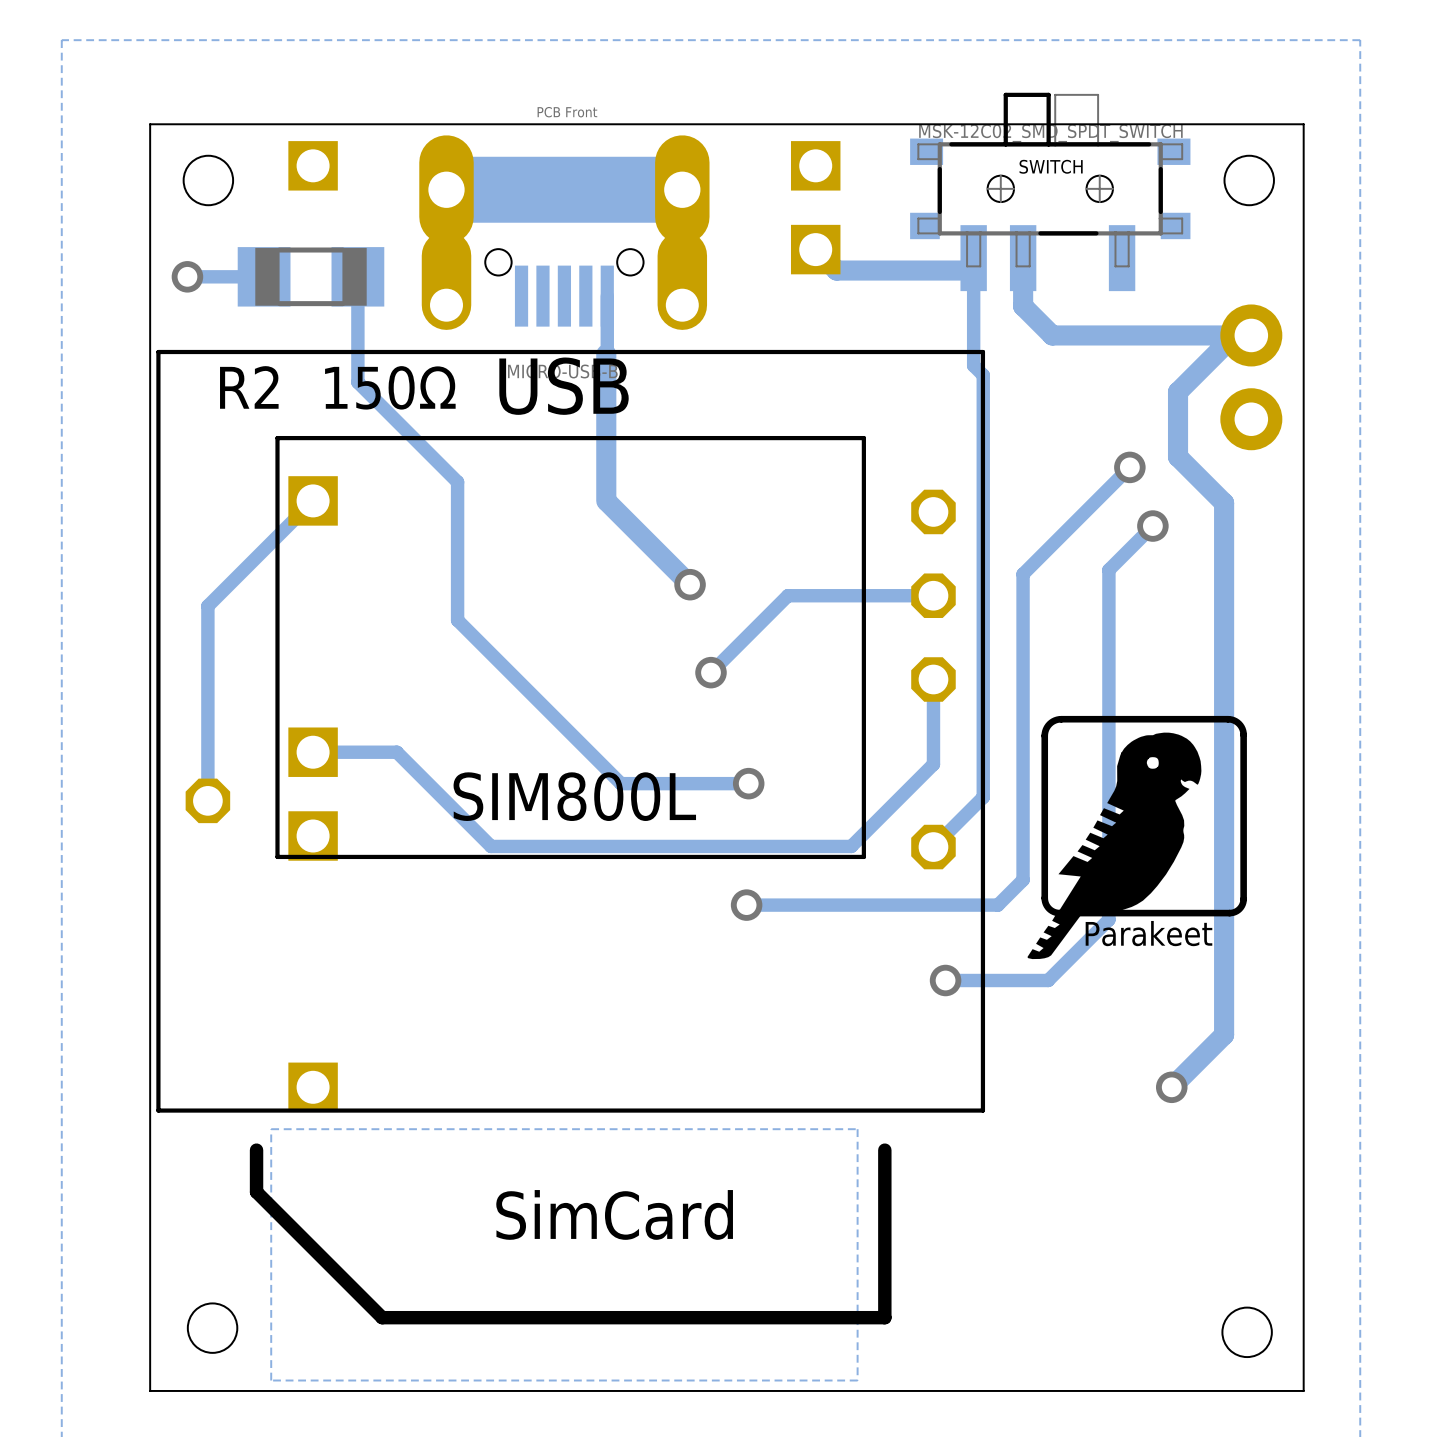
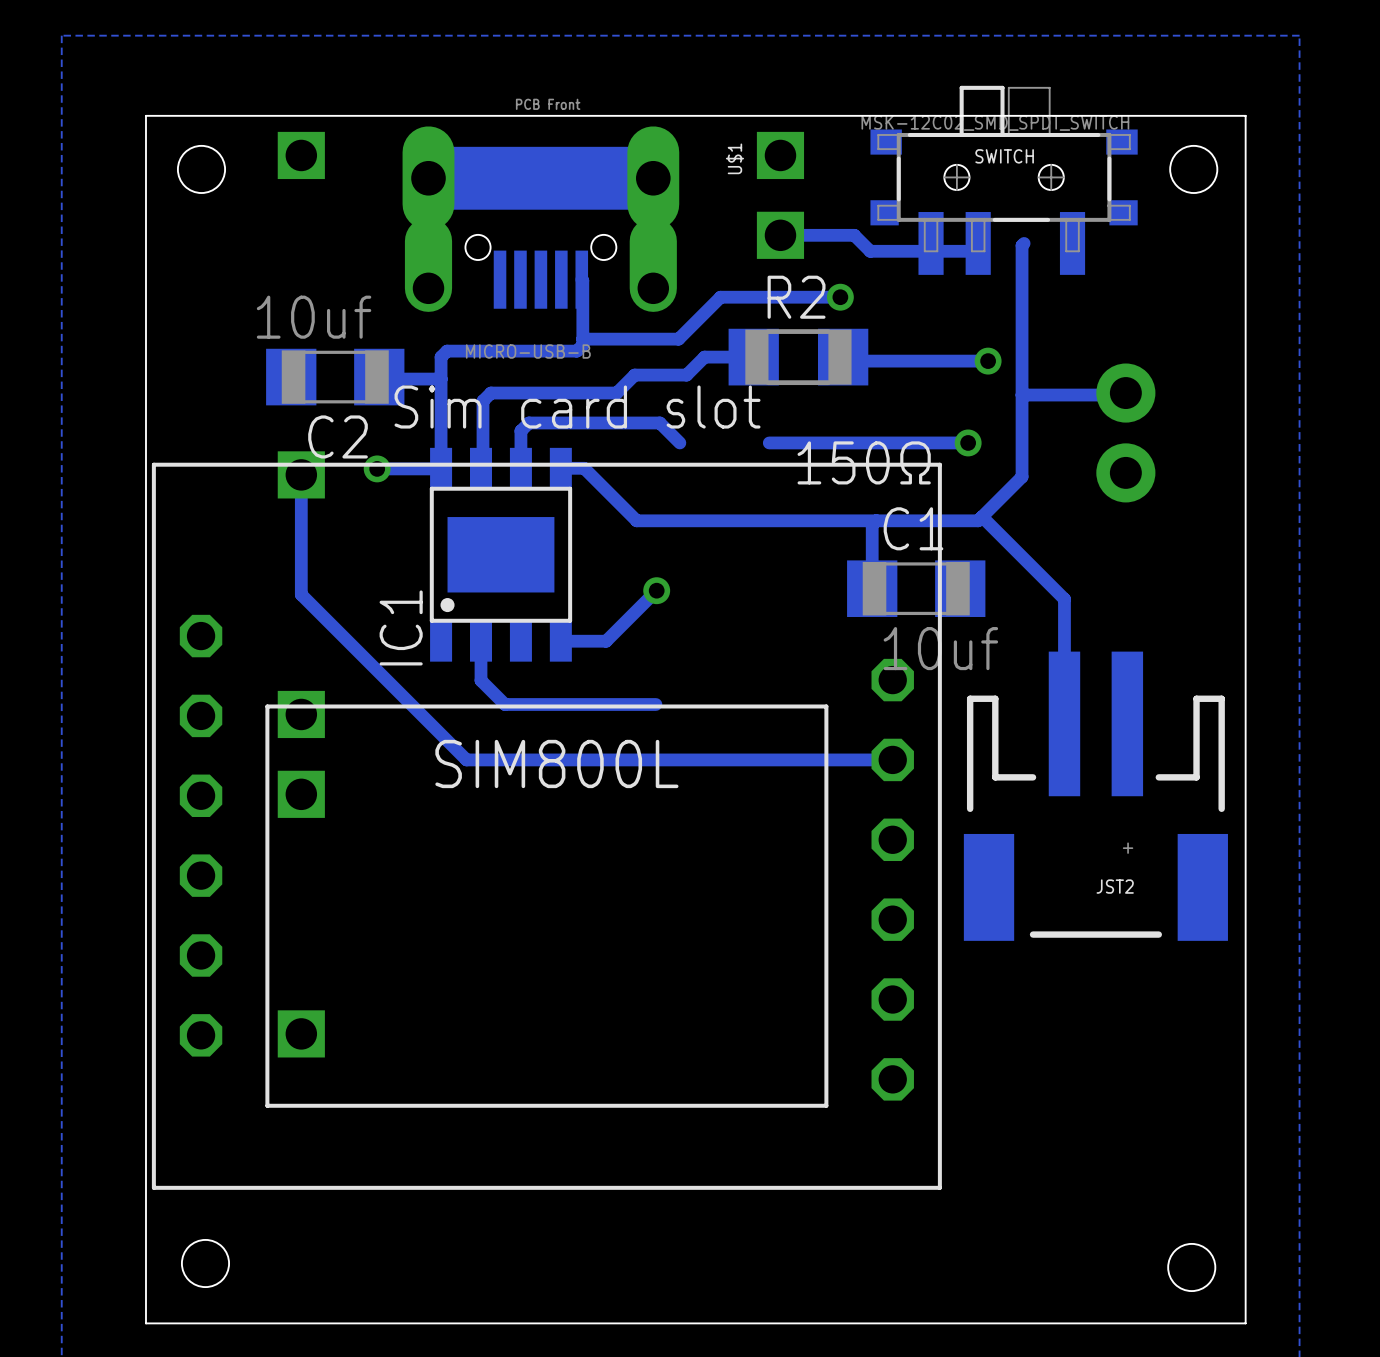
track: (815, 249) (836, 270) (962, 270) (971, 265) (973, 258) (973, 365) (983, 375) (983, 797) (933, 847) -> (780, 235) (854, 235) (870, 251) (969, 251) (976, 243)
track: (1023, 258) (1023, 306) (1052, 335) (1251, 335) (1234, 335) (1178, 392) (1178, 456) (1224, 503) (1224, 1034) (1171, 1087) -> none
track: none -> (1024, 243) (1022, 245) (1022, 476) (978, 520) (636, 520) (584, 468) (560, 468)
via: (187, 276) -> none
track: (264, 276) (187, 276) -> none
R2 position: (310, 276) -> (798, 357)
track: (357, 276) (357, 382) (457, 482) (457, 620) (620, 783) (748, 783) -> none
track: (607, 296) (606, 500) (690, 584) -> (581, 279) (582, 345) (576, 351) (447, 351) (441, 357) (441, 468) (377, 468)
track: none -> (840, 297) (720, 297) (678, 339) (582, 339)
via: none -> (840, 297)
part footprint: [156, 349, 986, 1325] -> [151, 462, 942, 1190]
track: none -> (753, 357) (704, 357) (686, 375) (634, 375) (616, 393) (490, 393) (483, 401) (483, 466) (481, 468)
track: none -> (843, 357) (847, 361) (988, 361)
part position: (1251, 377) -> (1125, 432)
via: none -> (988, 361)
USB name: USB (564, 386) -> U$1 (734, 158)
R2 name position: R2 (249, 387) -> R2 (796, 297)
C2: none -> 10uf (335, 377)
track: none -> (379, 377) (379, 379) (441, 379)
track: none -> (1125, 393) (1123, 395) (1022, 395)
track: none -> (679, 442) (659, 422) (528, 422) (520, 430) (520, 468)
track: none -> (968, 442) (769, 442)
via: none -> (968, 442)
track: (1129, 467) (1023, 574) (1023, 879) (997, 905) (746, 905) -> none
via: (1129, 467) -> none
via: none -> (377, 468)
track: (313, 500) (207, 606) (207, 800) -> (301, 474) (301, 594) (466, 759) (892, 759)
track: (1152, 526) (1108, 570) (1108, 919) (1048, 980) (945, 980) -> none
via: (1152, 526) -> none
track: none -> (982, 516) (1064, 599) (1064, 723)
track: none -> (876, 520) (872, 524) (872, 588)
IC1: none -> (500, 554)
via: (690, 584) -> none
track: (933, 595) (787, 595) (711, 672) -> none
C1: none -> 10uf (916, 588)
track: none -> (656, 590) (606, 641) (560, 641)
via: none -> (656, 590)
via: (711, 672) -> none
track: none -> (481, 641) (481, 680) (504, 704) (655, 704)
track: (933, 679) (933, 764) (851, 846) (491, 846) (396, 752) (313, 752) -> none
drawing: [1027, 715, 1247, 960] -> none
via: (748, 783) -> none
JST2: none -> + (1095, 796)
via: (746, 905) -> none
via: (945, 980) -> none
via: (1171, 1087) -> none
zone outline: (857, 1129) (271, 1129) (271, 1380) (857, 1380) (857, 1129) -> none

